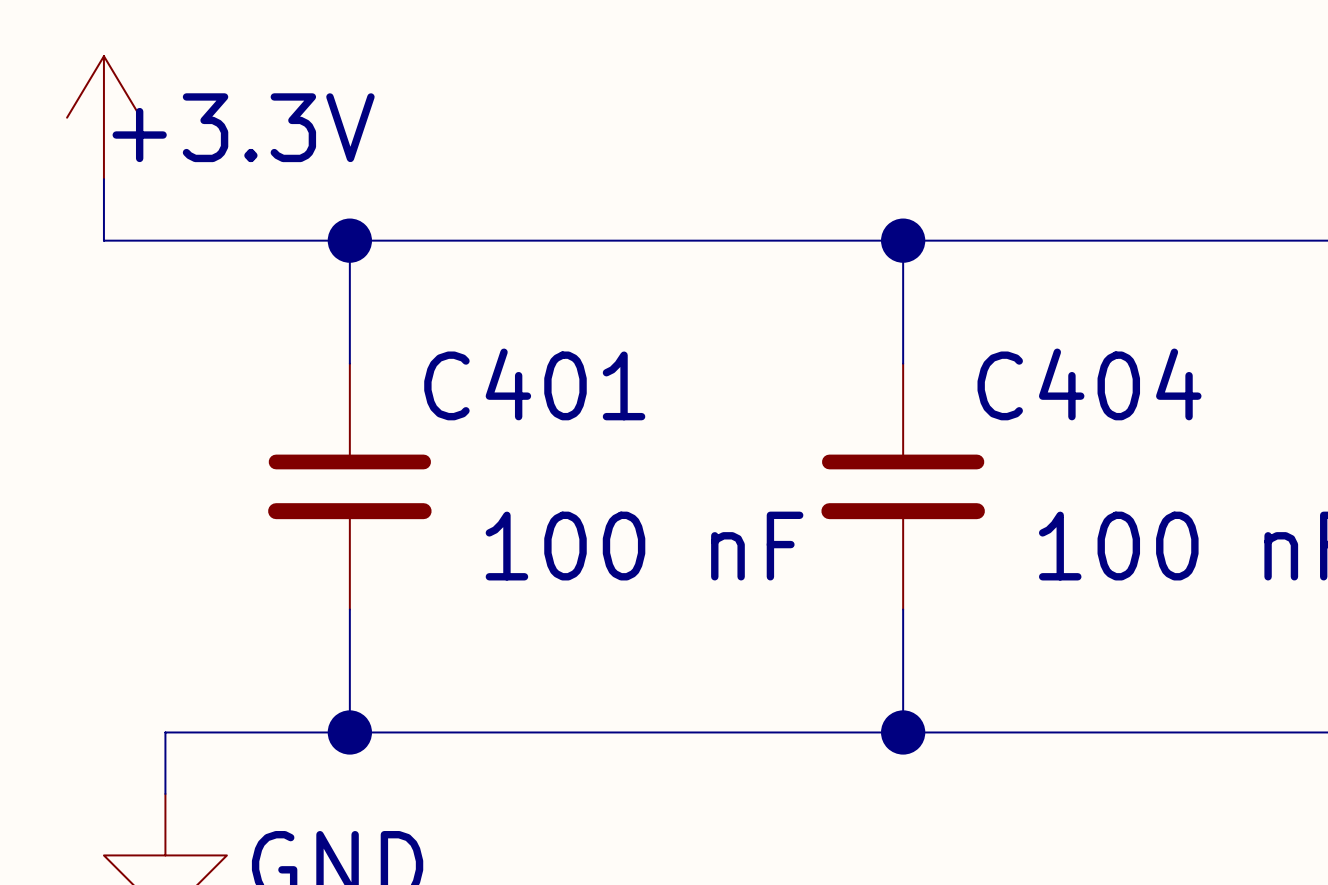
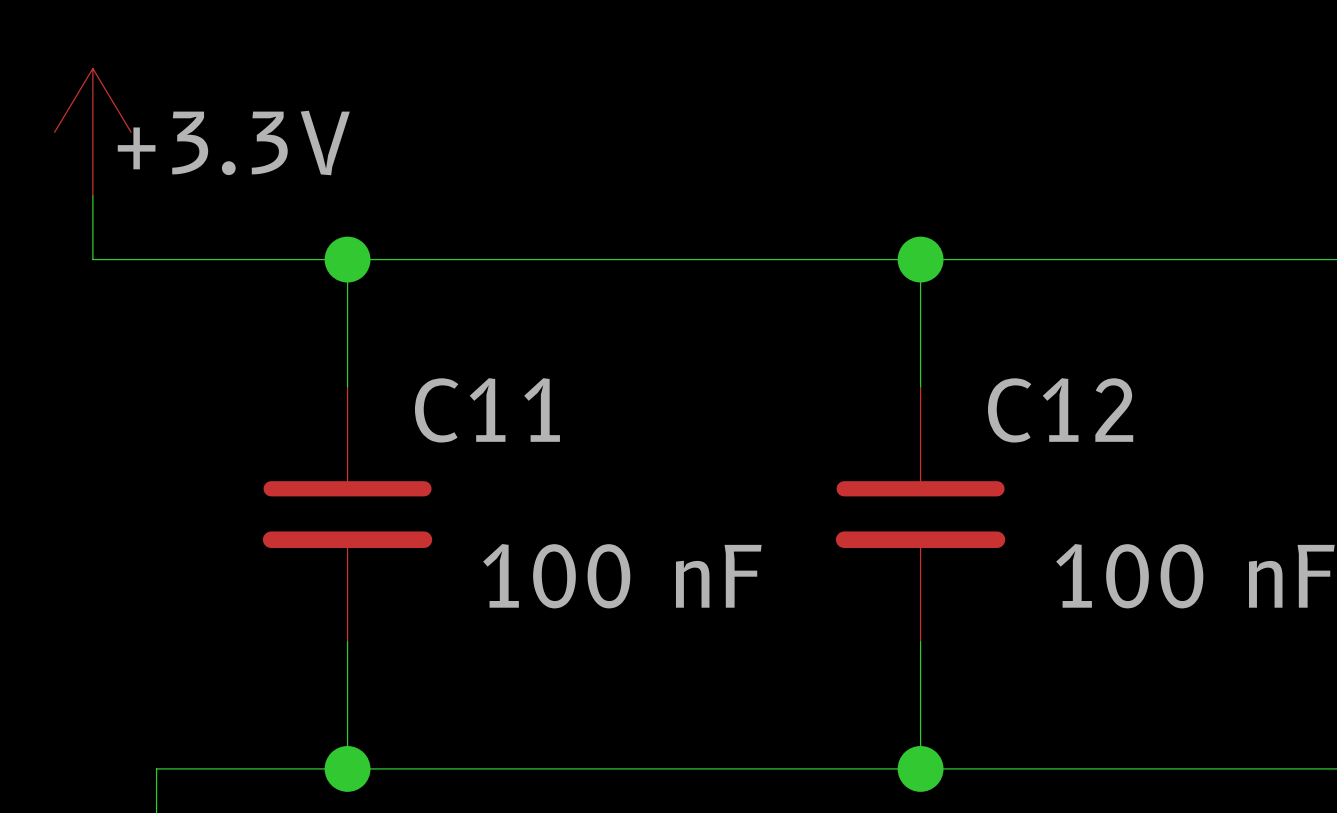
C401 name: C401 (534, 384) -> C11 (487, 410)
C404 name: C404 (1089, 384) -> C12 (1060, 410)

